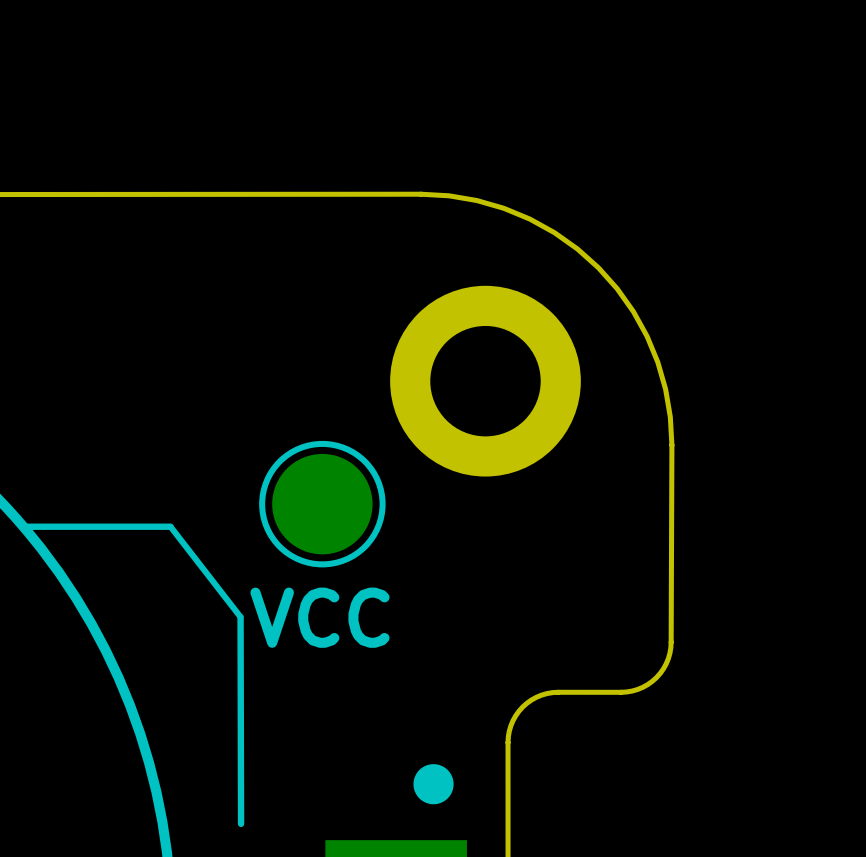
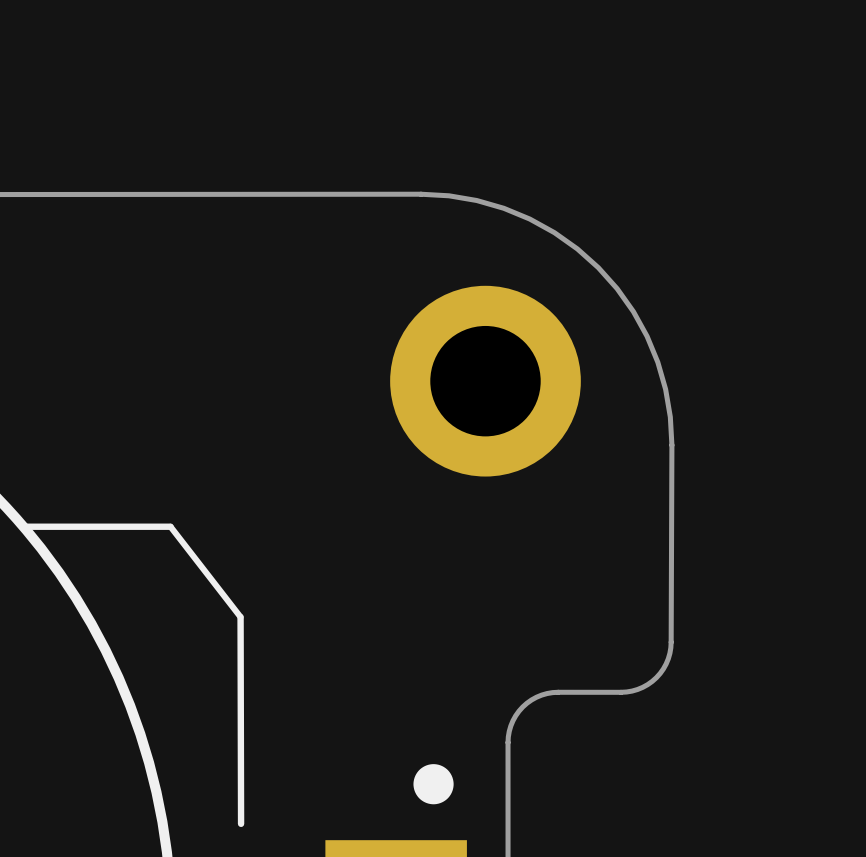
part: (322, 504) -> none
text: VCC (319, 617) -> none

